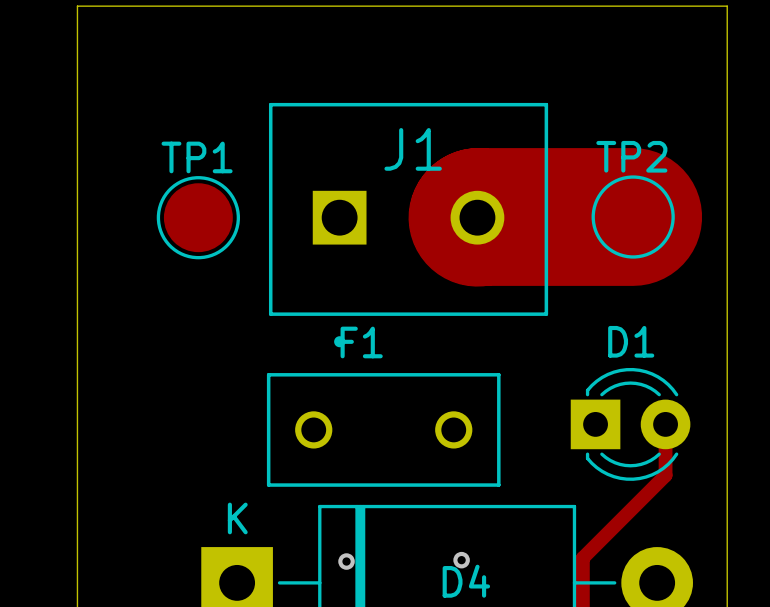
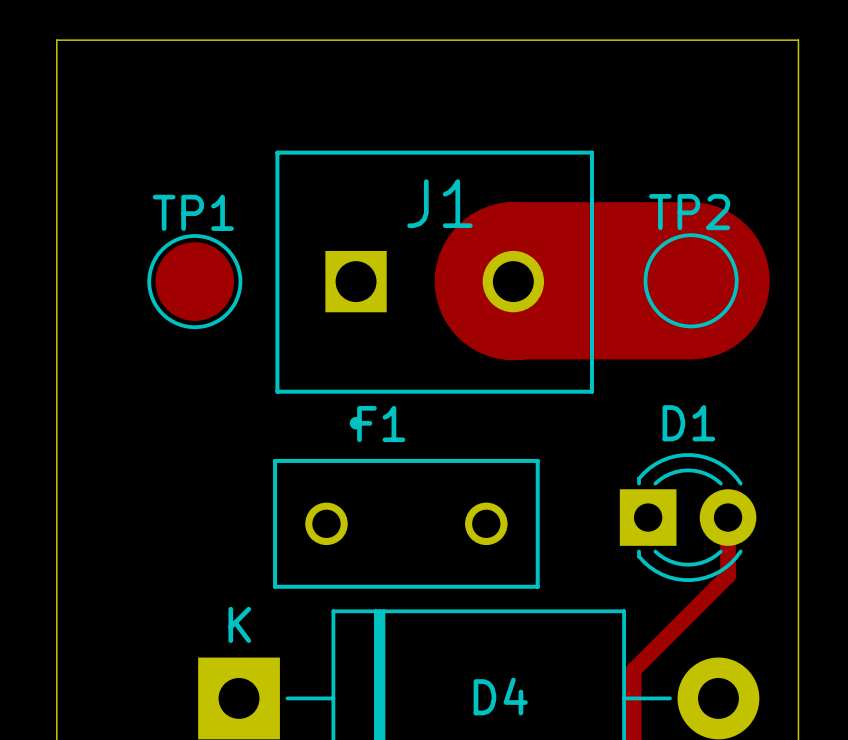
via: (461, 560) -> none
via: (346, 561) -> none

